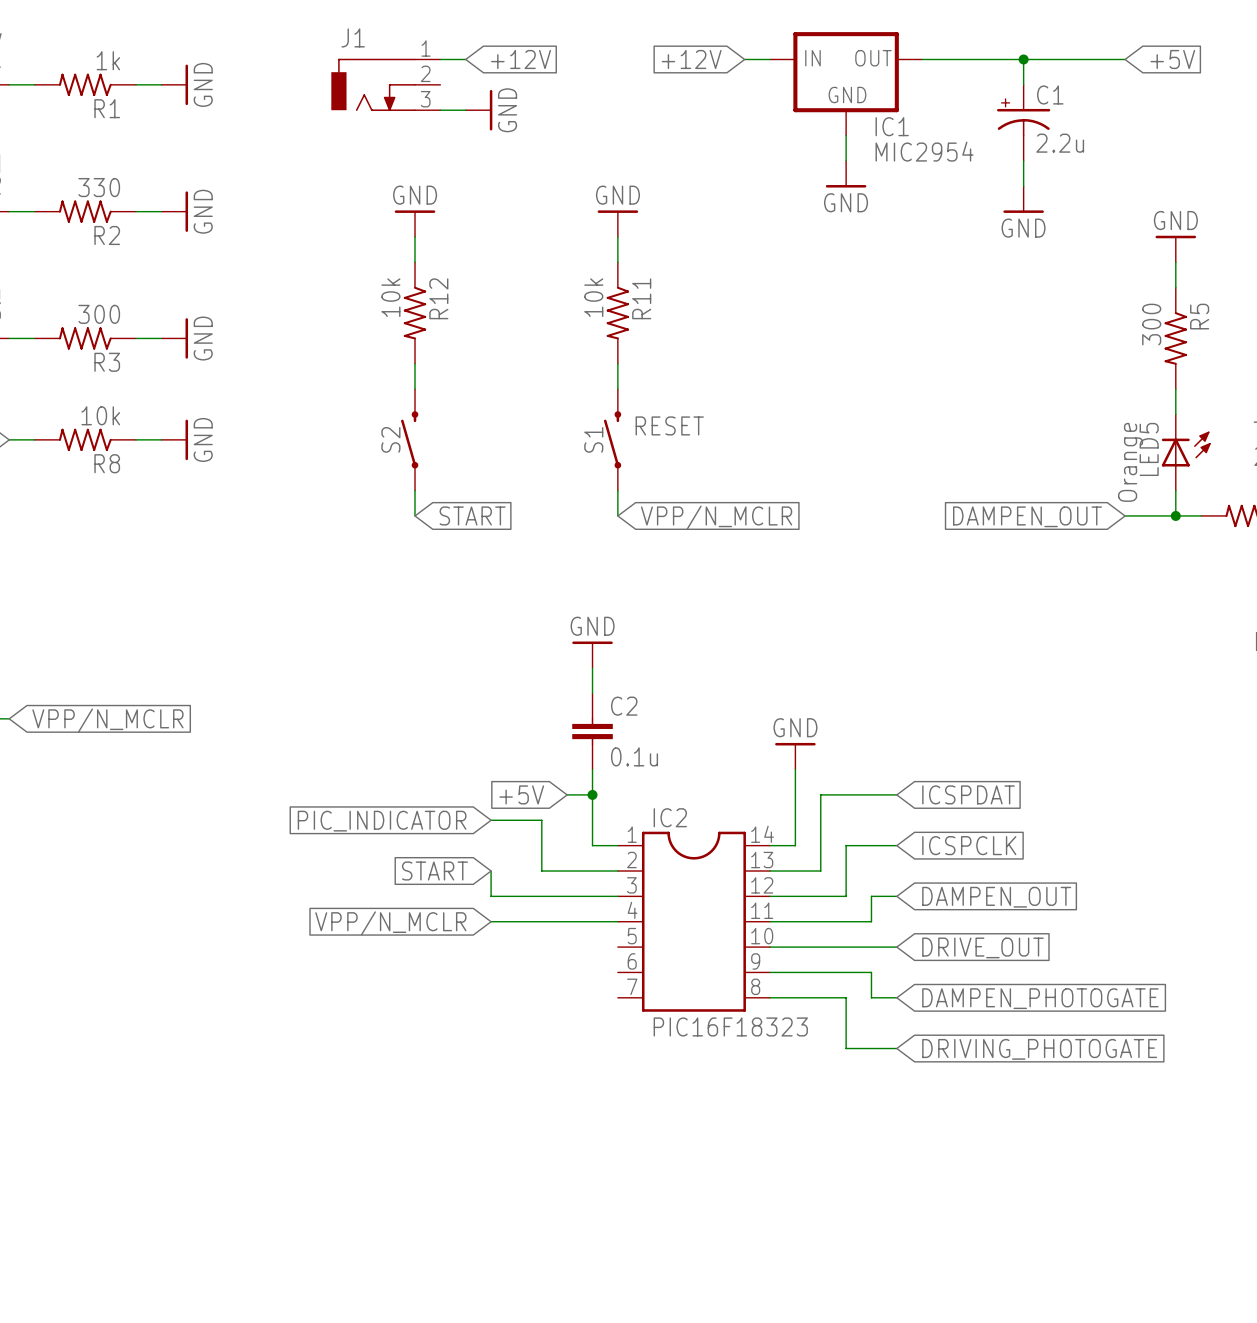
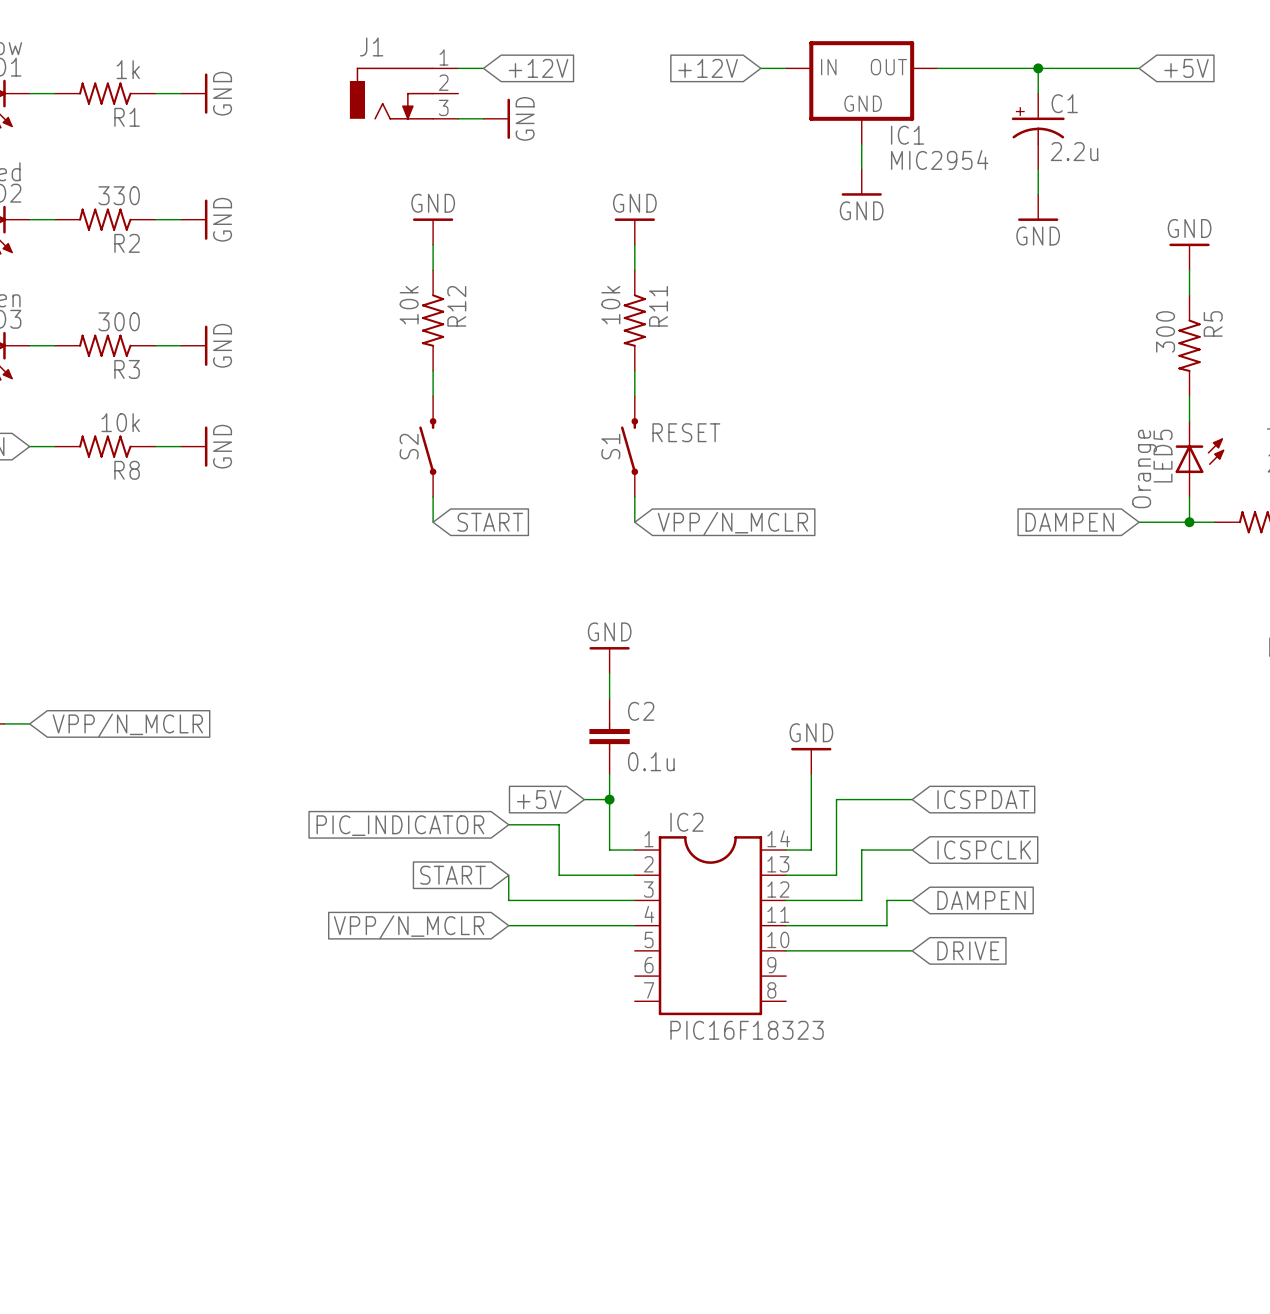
global label: DAMPEN_OUT (1027, 516) -> DAMPEN (1069, 522)
global label: DAMPEN_OUT (996, 897) -> DAMPEN (981, 900)
global label: DRIVE_OUT (982, 947) -> DRIVE (968, 950)
wire: (770, 972) (871, 972) (871, 997) (896, 997) -> none
wire: (770, 997) (846, 997) (846, 1048) (896, 1048) -> none
global label: DAMPEN_PHOTOGATE (1040, 998) -> none
global label: DRIVING_PHOTOGATE (1039, 1049) -> none

